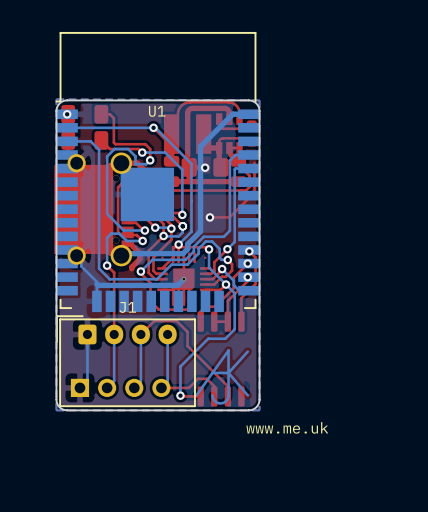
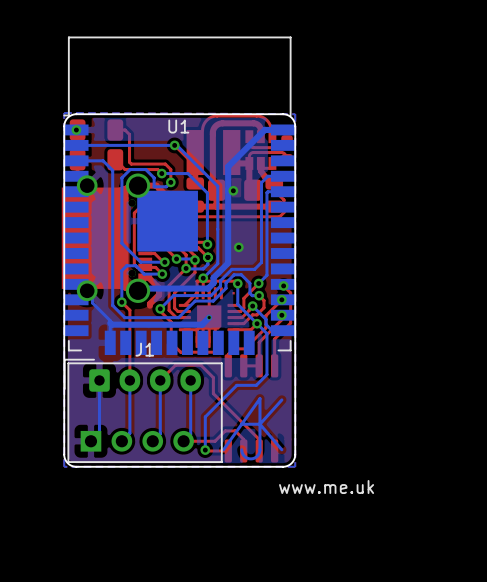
part footprint: [163, 100, 257, 187] -> [186, 114, 293, 213]
top track: (254, 162) (254, 192) (229, 217) (209, 217) -> none

